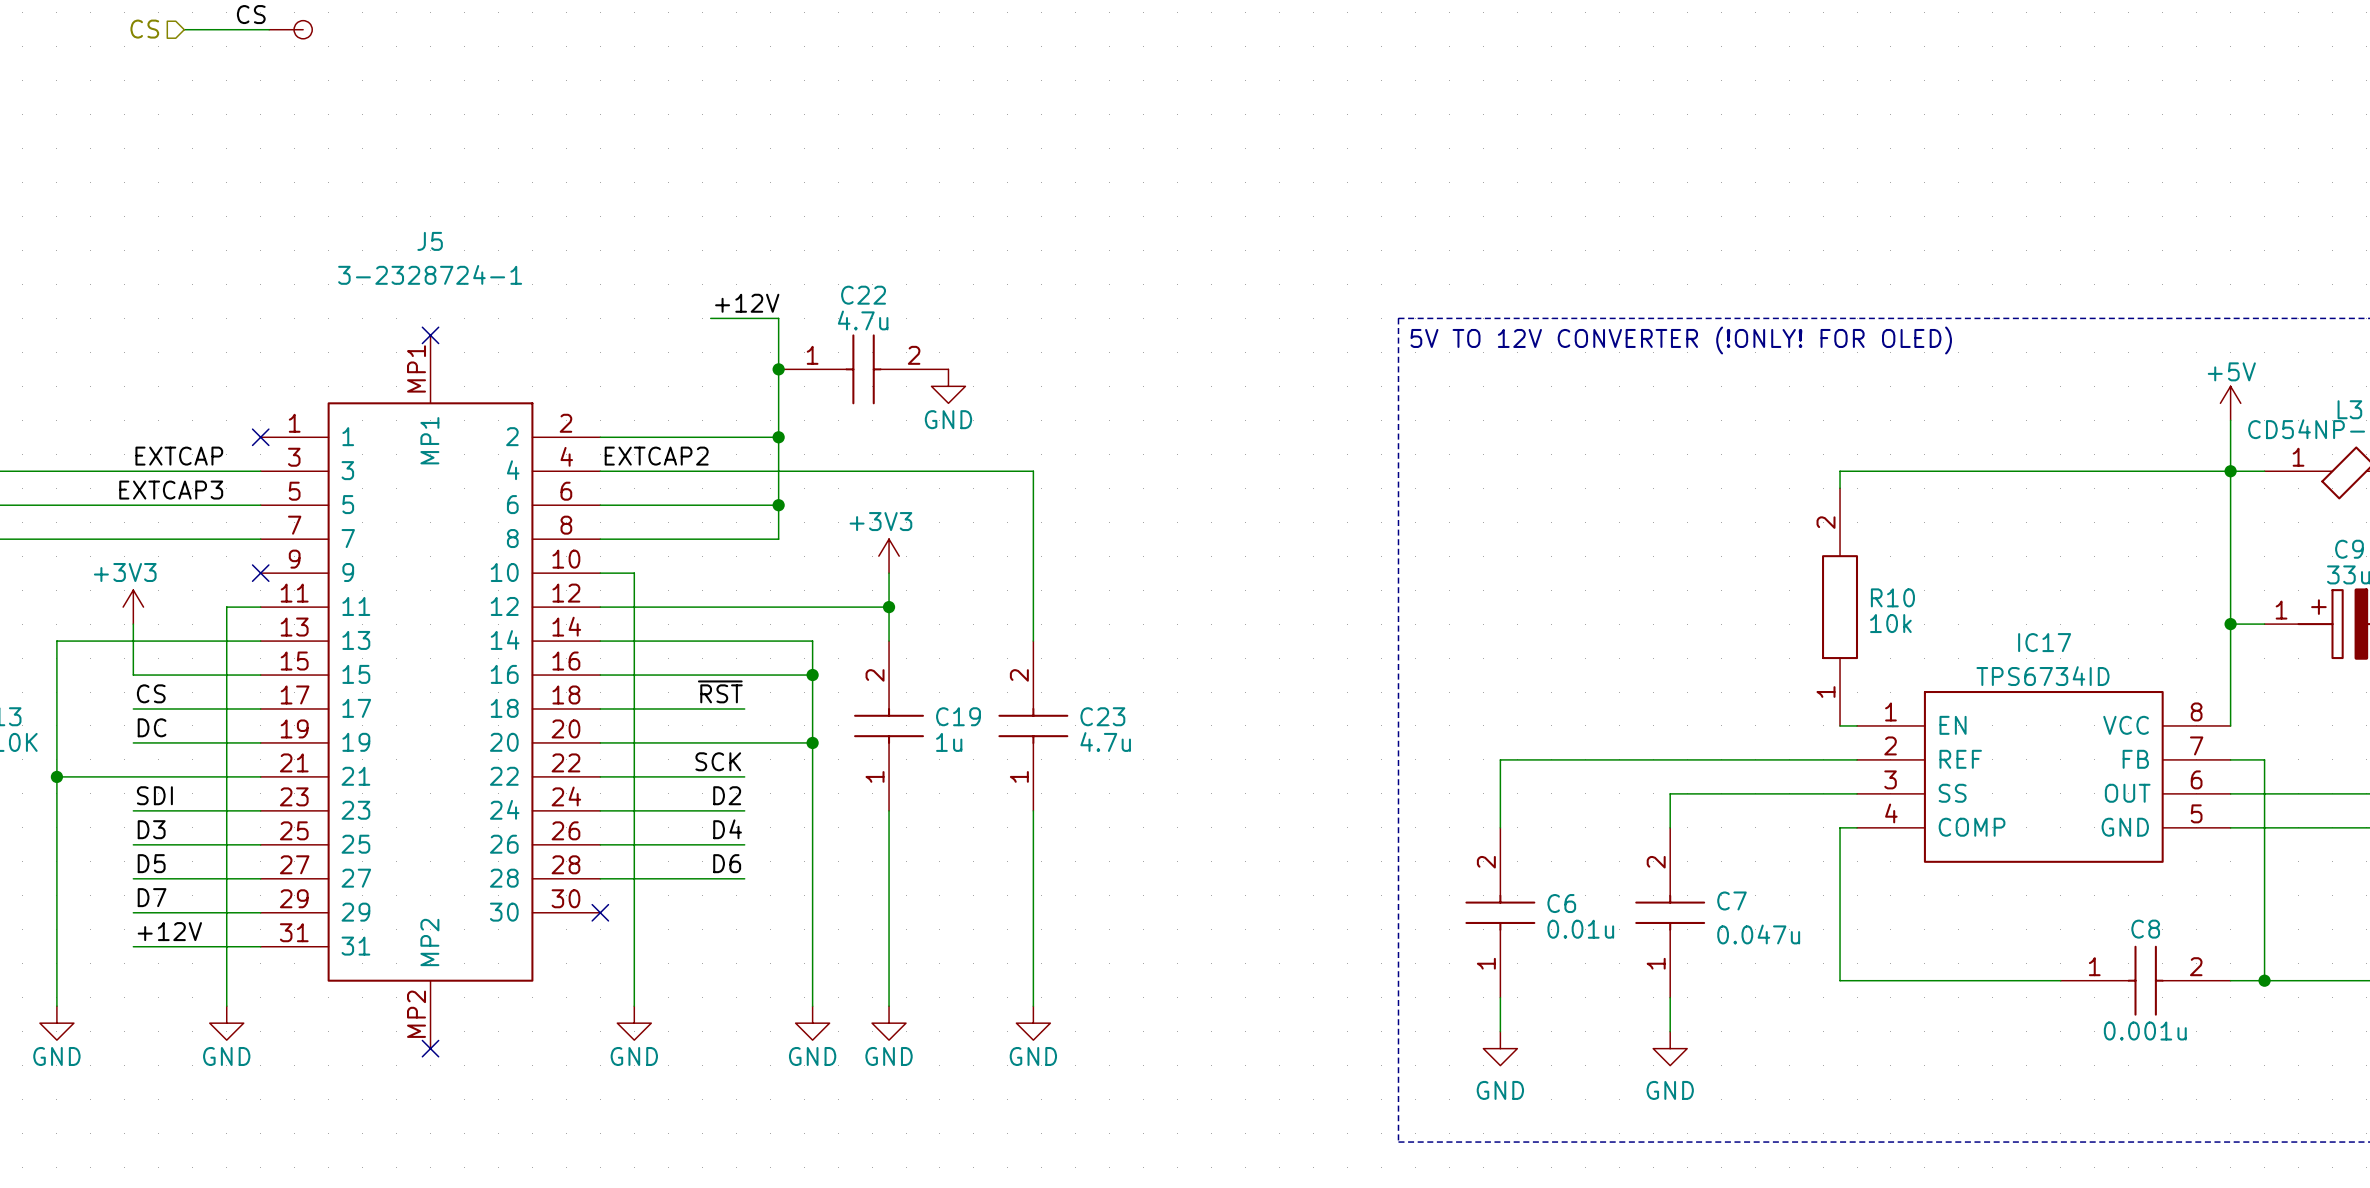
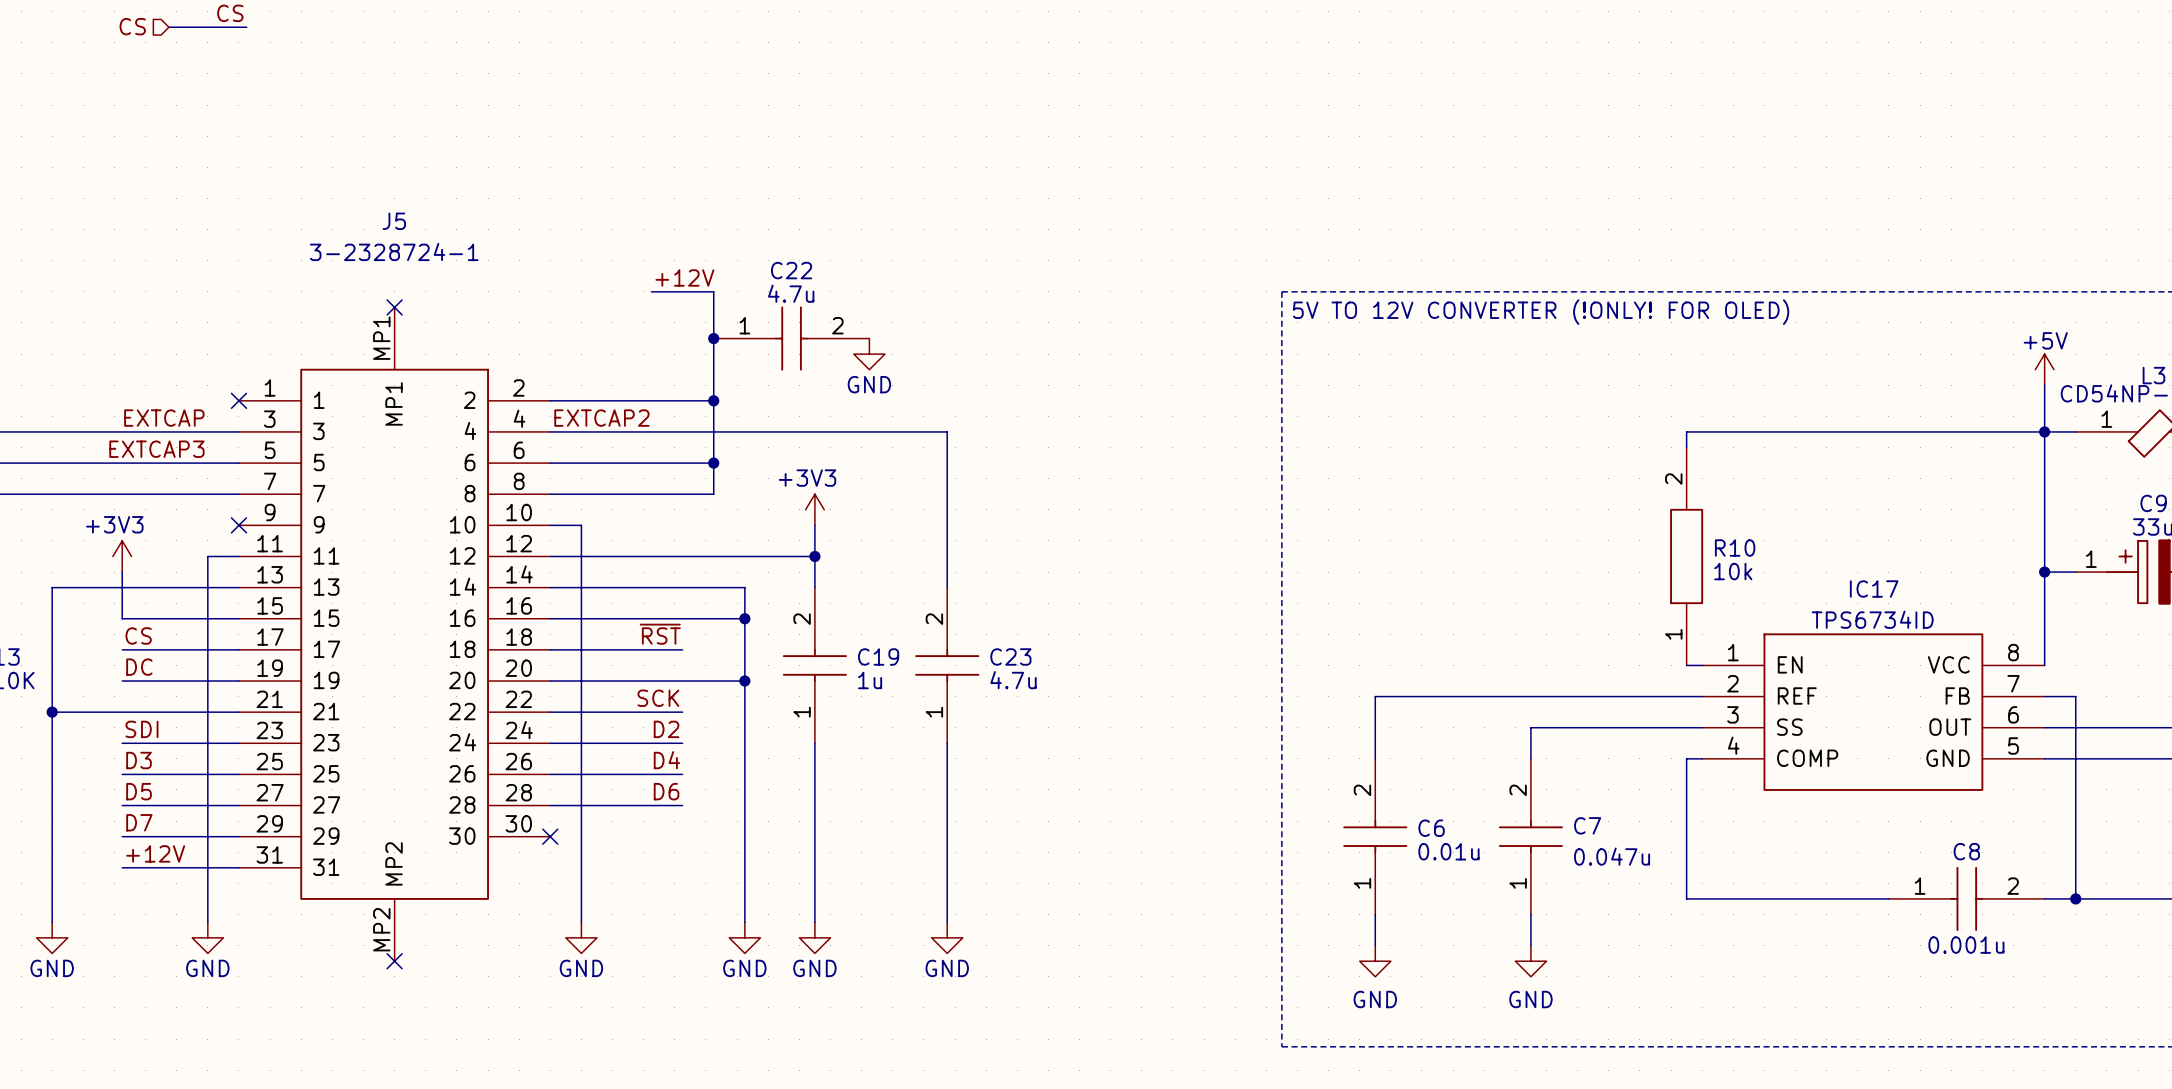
part: (290, 29) -> none

